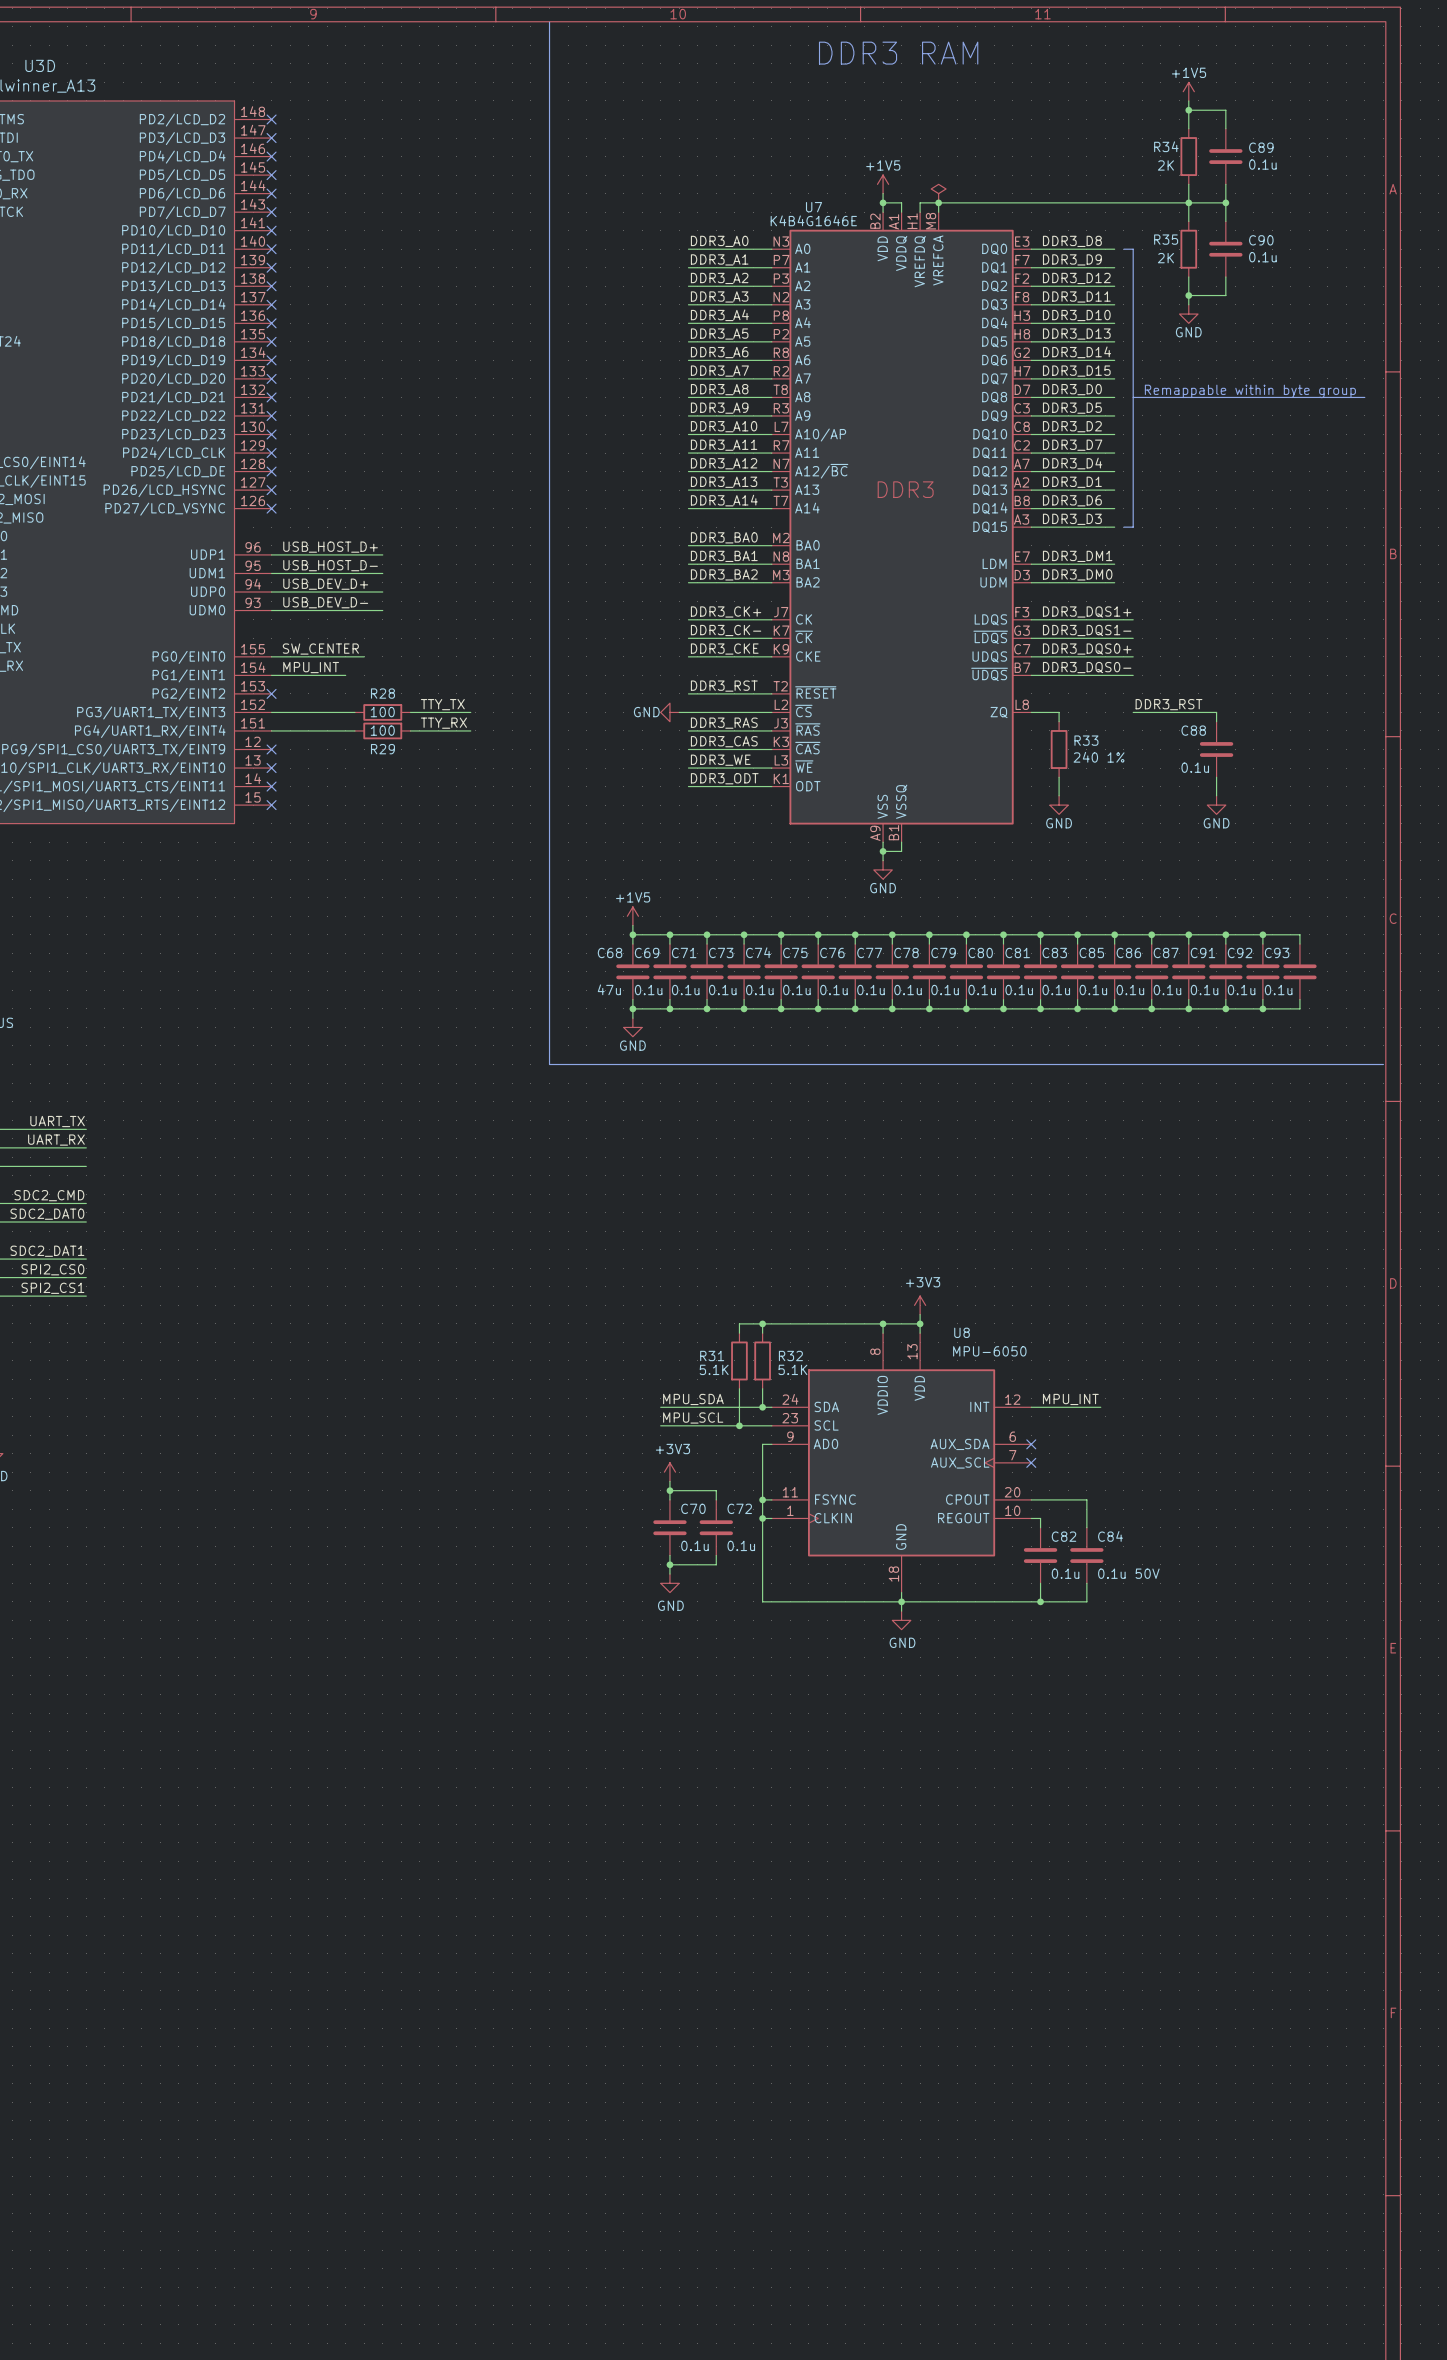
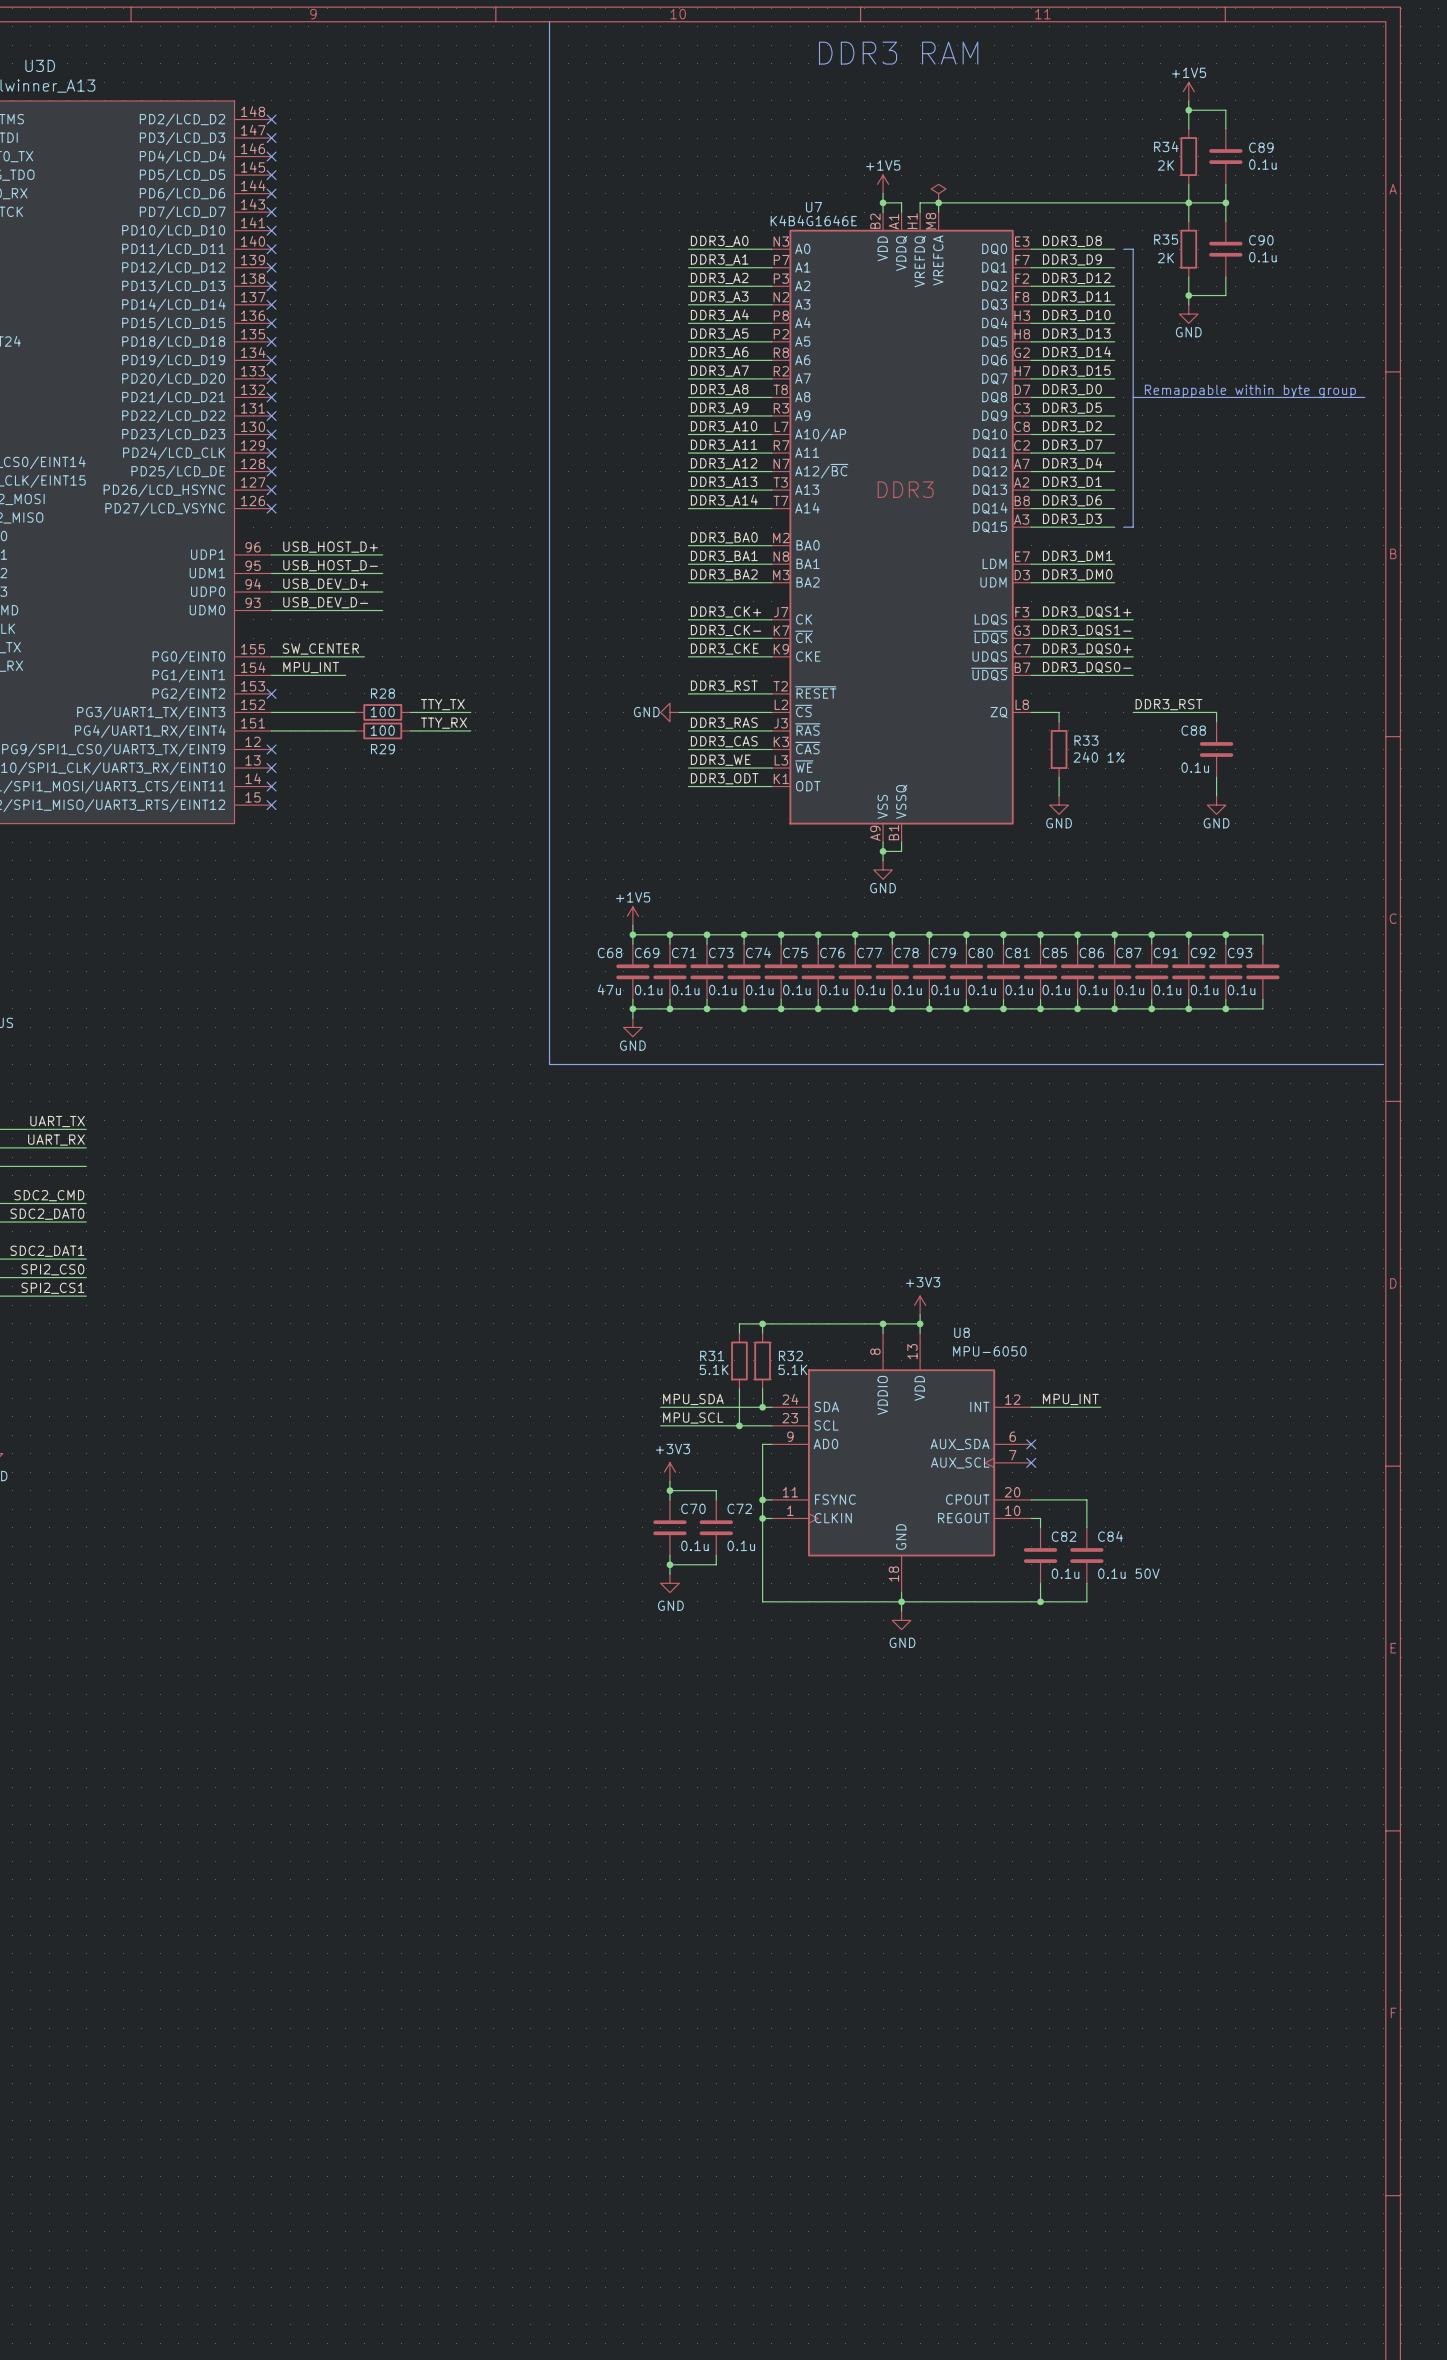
wire: (1262, 934) (1299, 934) (1299, 944) -> none
junction: (1262, 934) -> none
C83 name: C83 (1054, 952) -> C85 (1054, 952)
C85 name: C85 (1091, 952) -> C86 (1091, 952)
C86 name: C86 (1128, 952) -> C87 (1129, 952)
C87 name: C87 (1166, 952) -> C91 (1165, 952)
C91 name: C91 (1202, 952) -> C92 (1202, 952)
C92 name: C92 (1240, 952) -> C93 (1240, 952)
C93: 0.1u (1299, 971) -> none
wire: (1299, 999) (1299, 1008) (1262, 1008) -> none
junction: (1262, 1008) -> none

